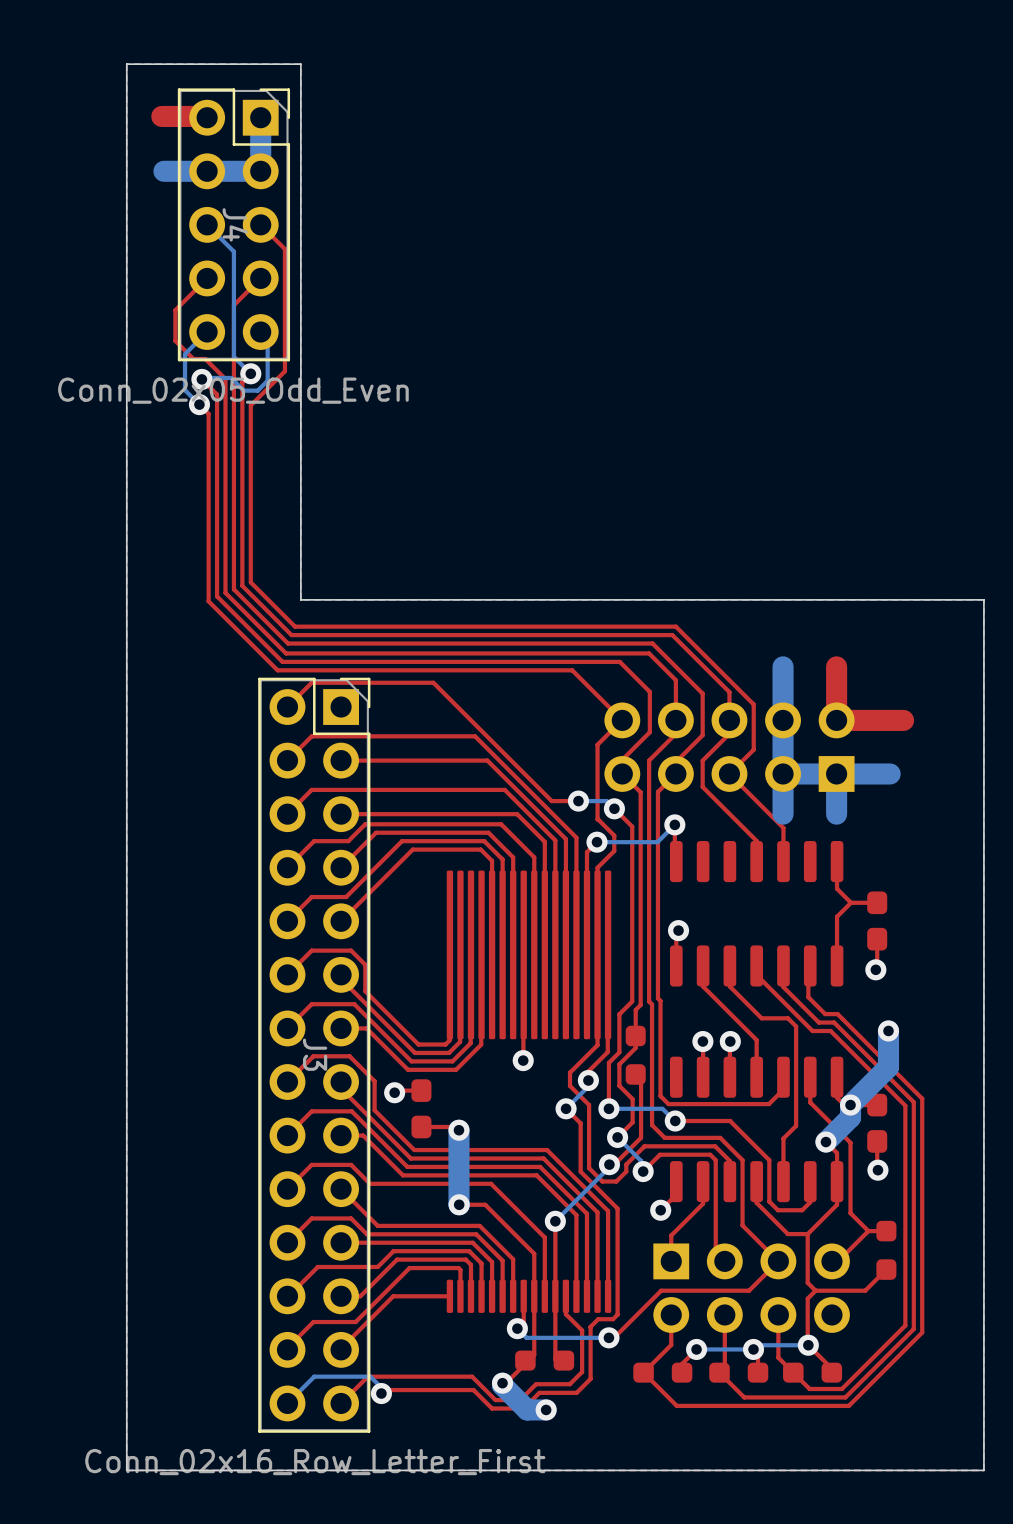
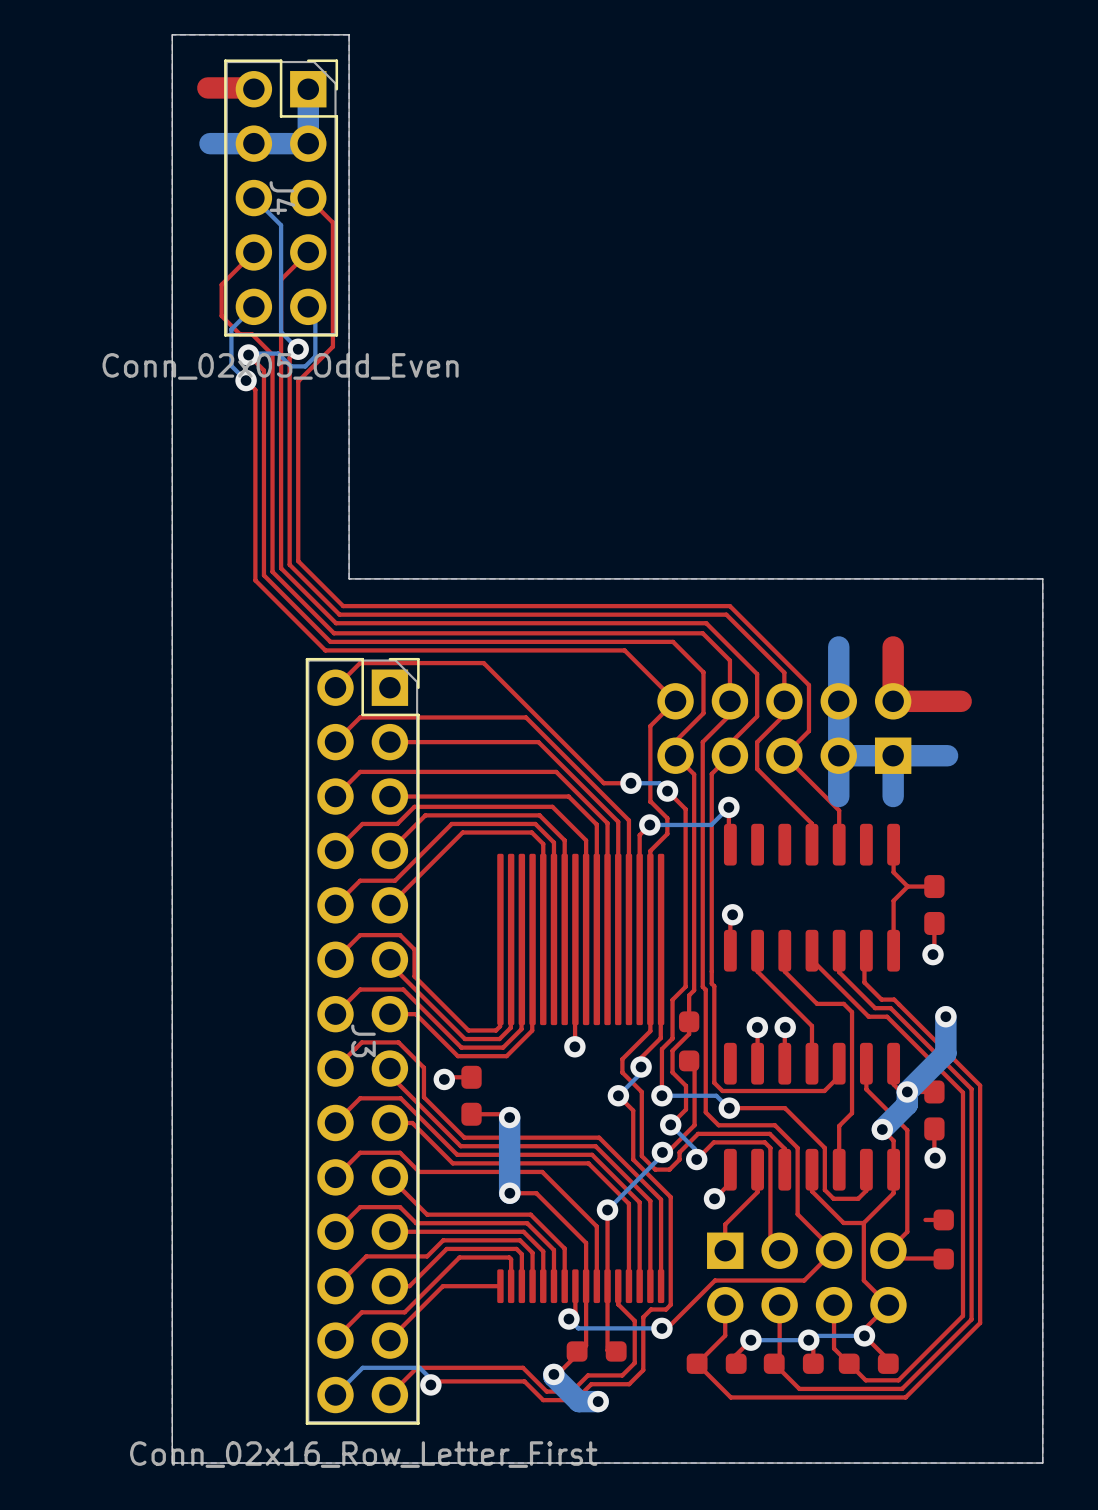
top track: (850, 1213) (868, 1231) (838, 1261) (831, 1261) -> (907, 1201) (907, 1231) (888, 1250) (896, 1258) (943, 1258)
top track: (886, 1269) (865, 1290) (815, 1290) -> none
top track: (807, 1282) (815, 1290) -> (863, 1272) (863, 1280) (888, 1305) (864, 1329)
top track: (815, 1290) (807, 1298) (808, 1345) -> none

